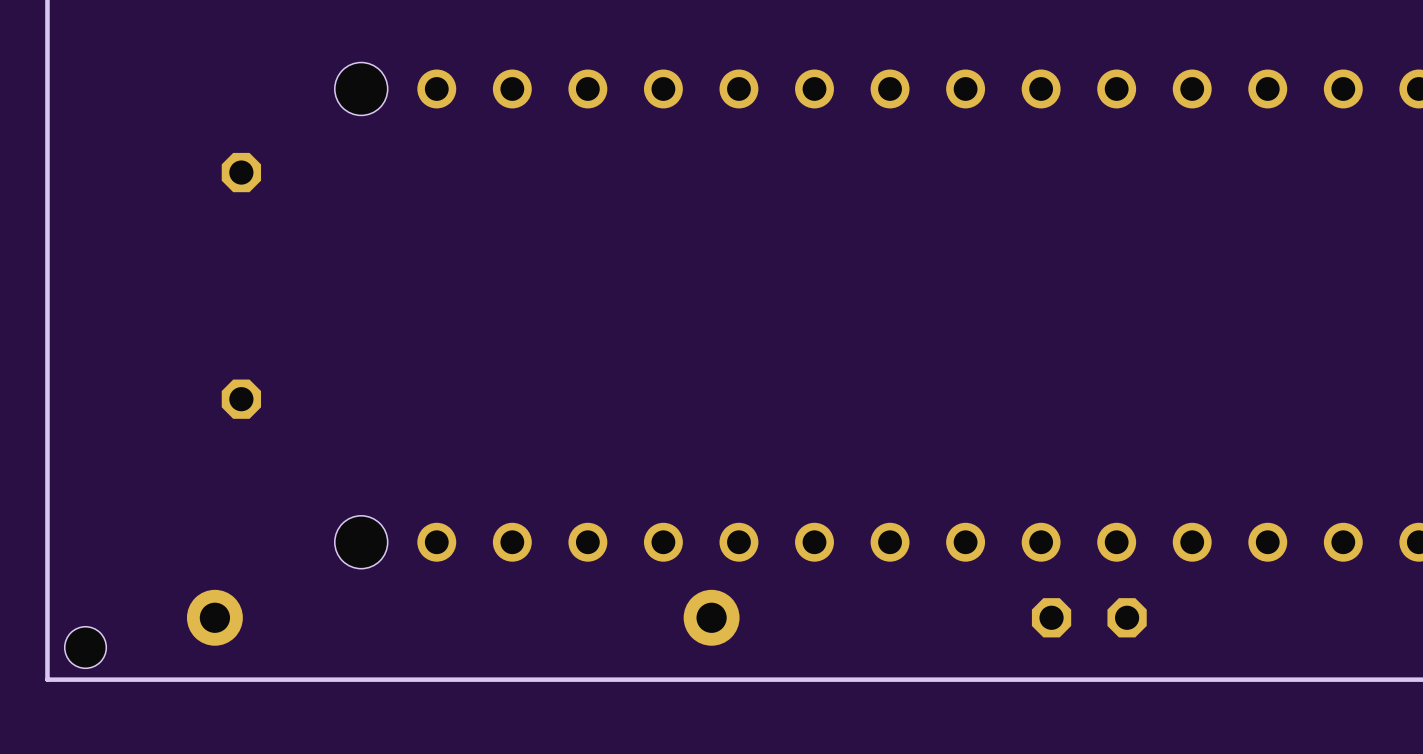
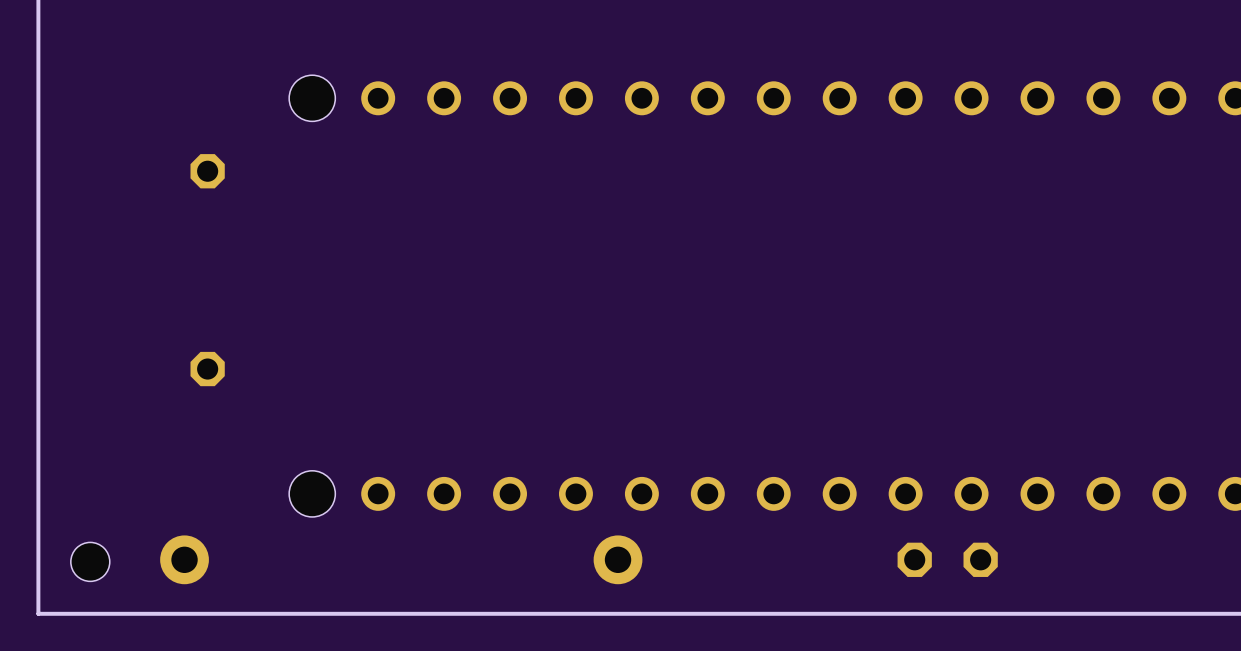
hole: none -> (90, 561)
hole: (85, 647) -> none

